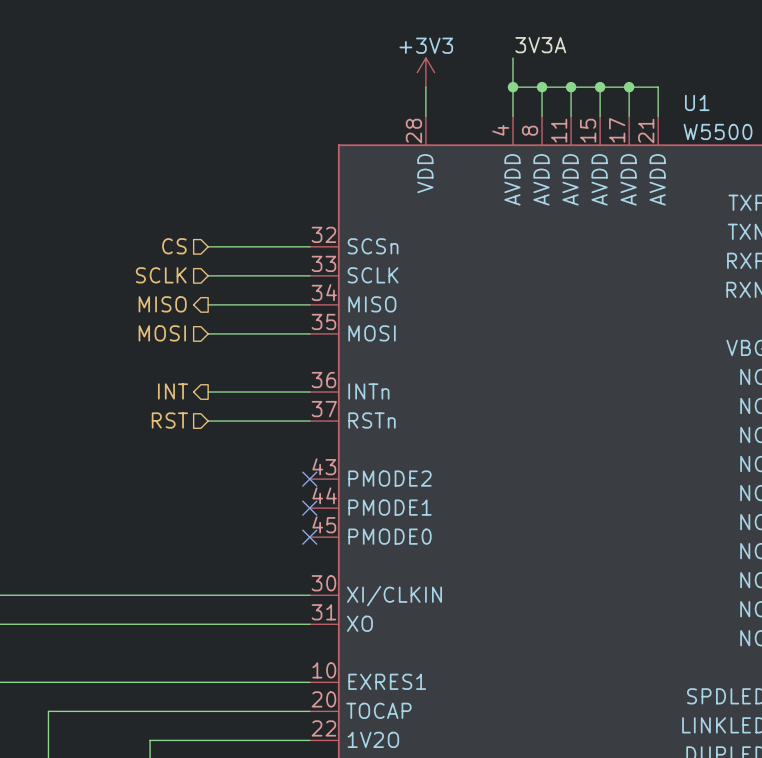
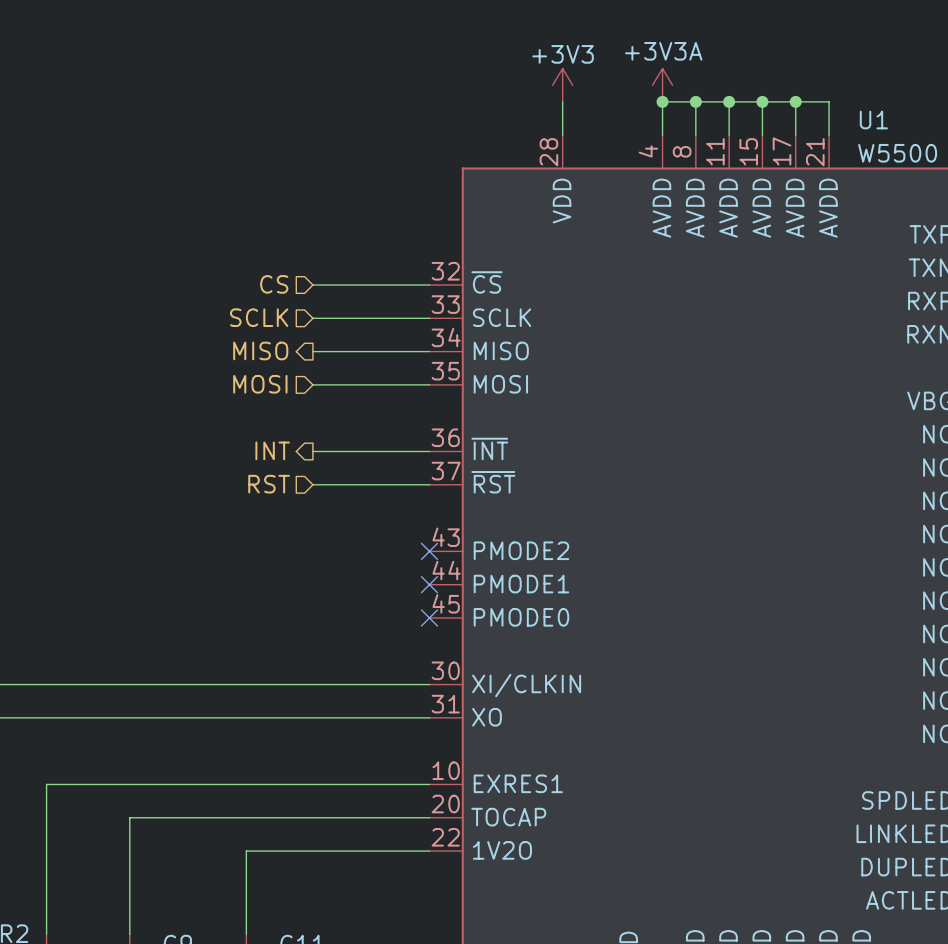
label: 3V3A (540, 45) -> none
power symbol: none -> +3V3A (662, 85)
U1 pin name: SCSn (373, 246) -> ~{CS} (487, 282)
U1 pin name: INTn (368, 391) -> ~{INT} (489, 448)
U1 pin name: RSTn (372, 420) -> ~{RST} (493, 482)

